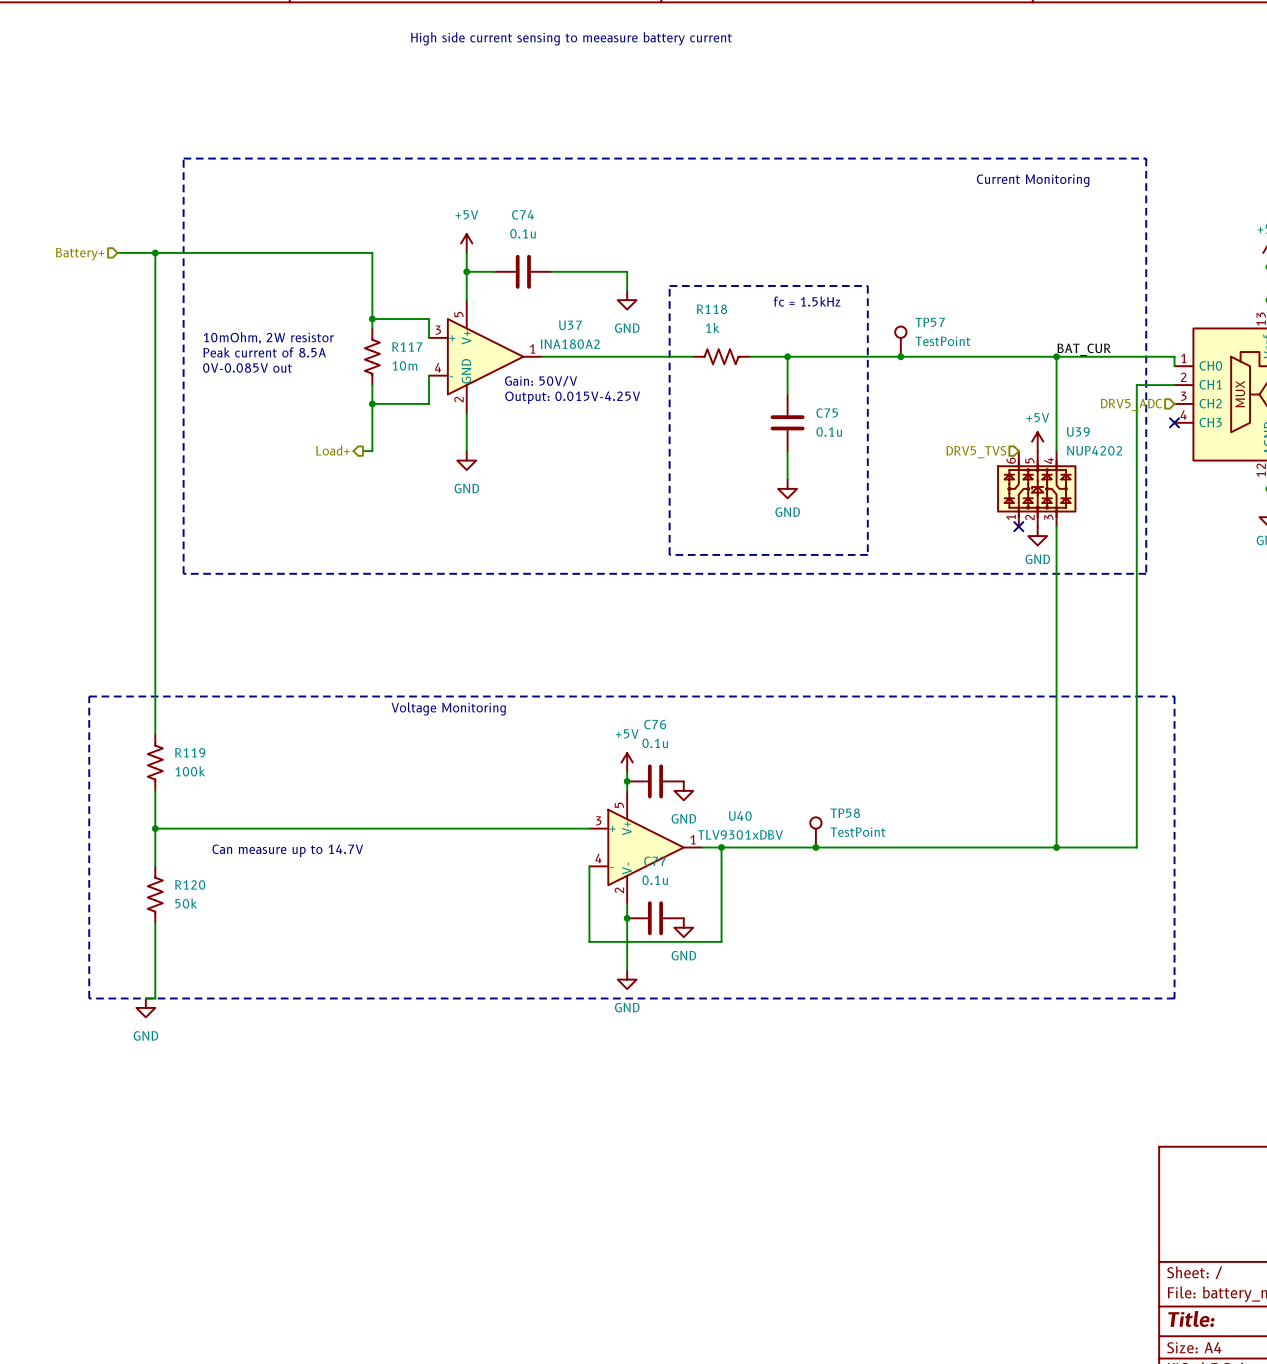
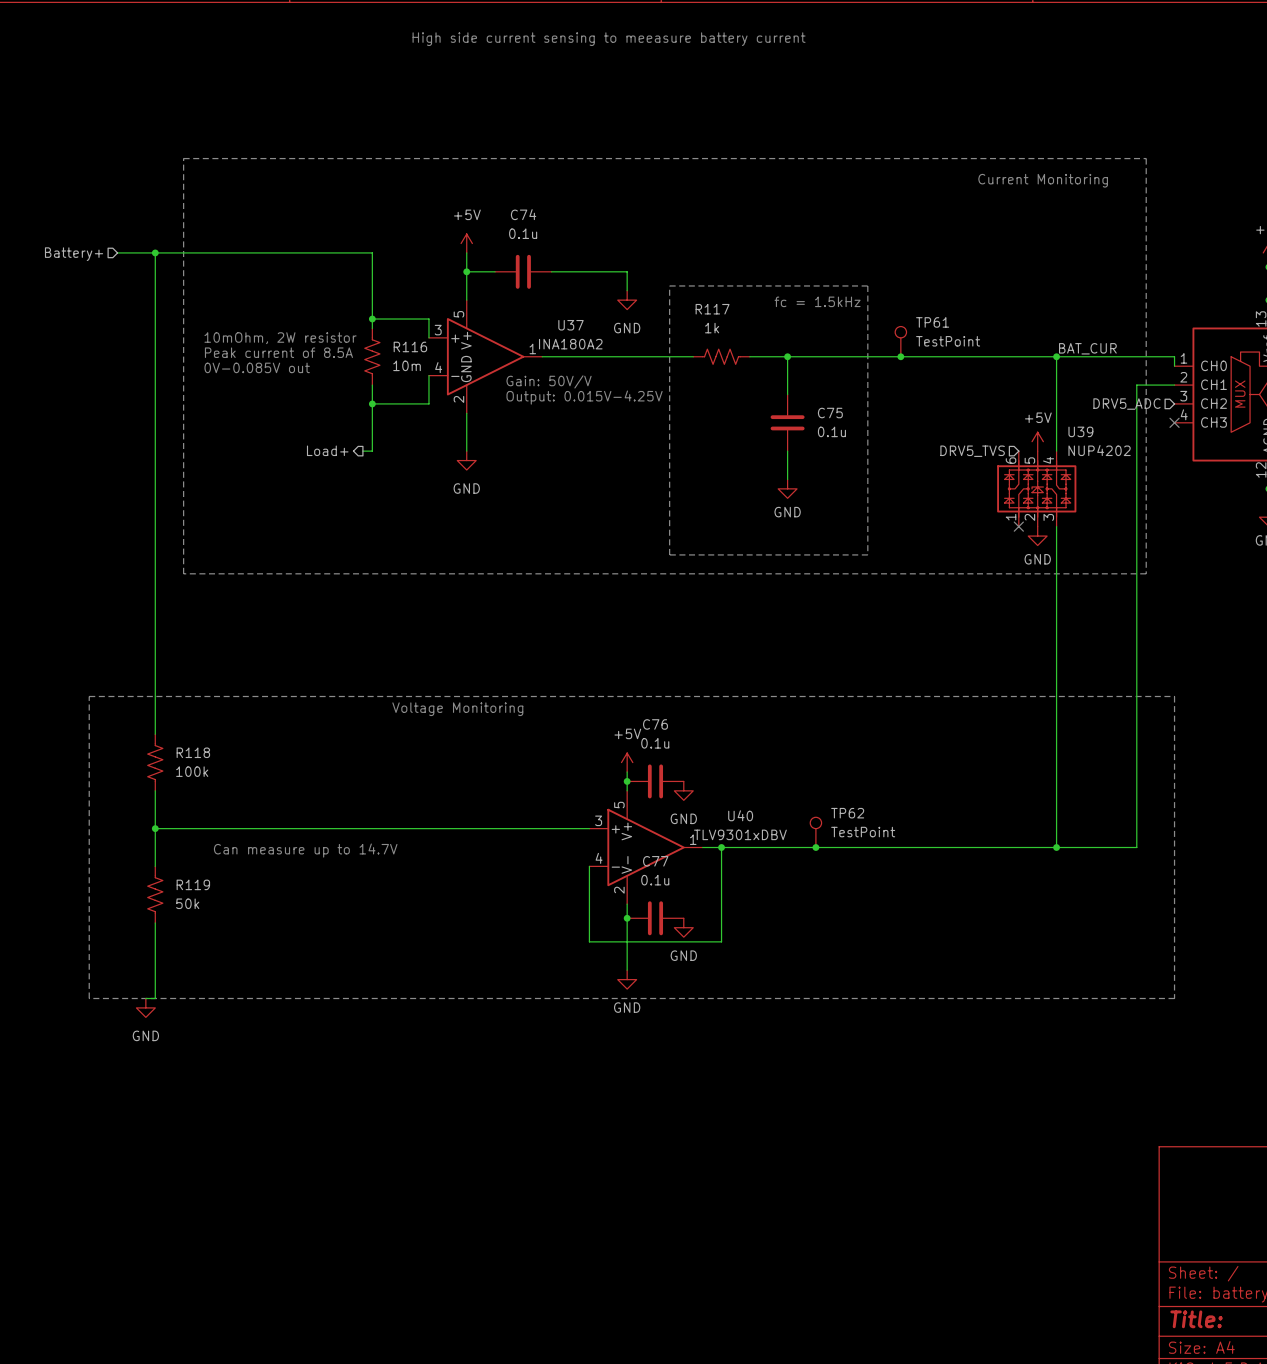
R118 name: R118 (712, 309) -> R117 (712, 309)
TP57 name: TP57 (930, 322) -> TP61 (932, 322)
R117 name: R117 (407, 346) -> R116 (410, 346)
R119 name: R119 (190, 752) -> R118 (193, 752)
TP58 name: TP58 (845, 813) -> TP62 (847, 813)
R120 name: R120 (190, 884) -> R119 (193, 884)

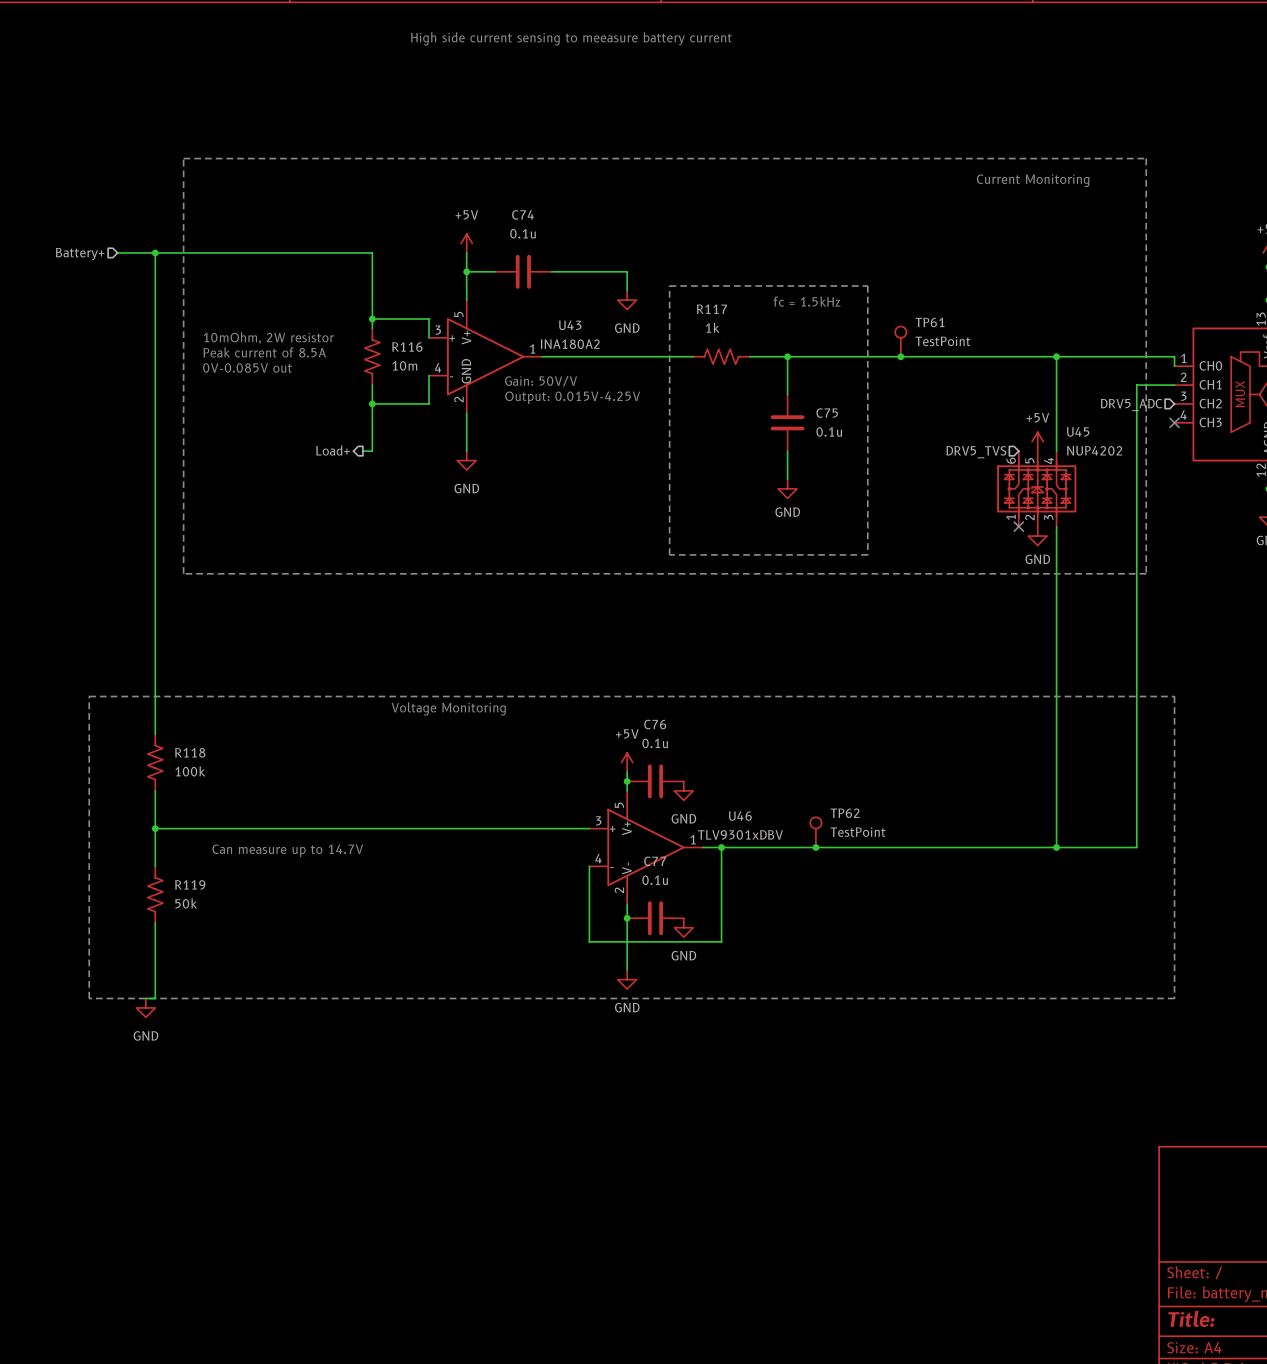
U37 name: U37 (570, 325) -> U43 (570, 325)
label: BAT_CUR (1087, 348) -> none
U39 name: U39 (1080, 431) -> U45 (1078, 431)
U40 name: U40 (740, 815) -> U46 (740, 816)

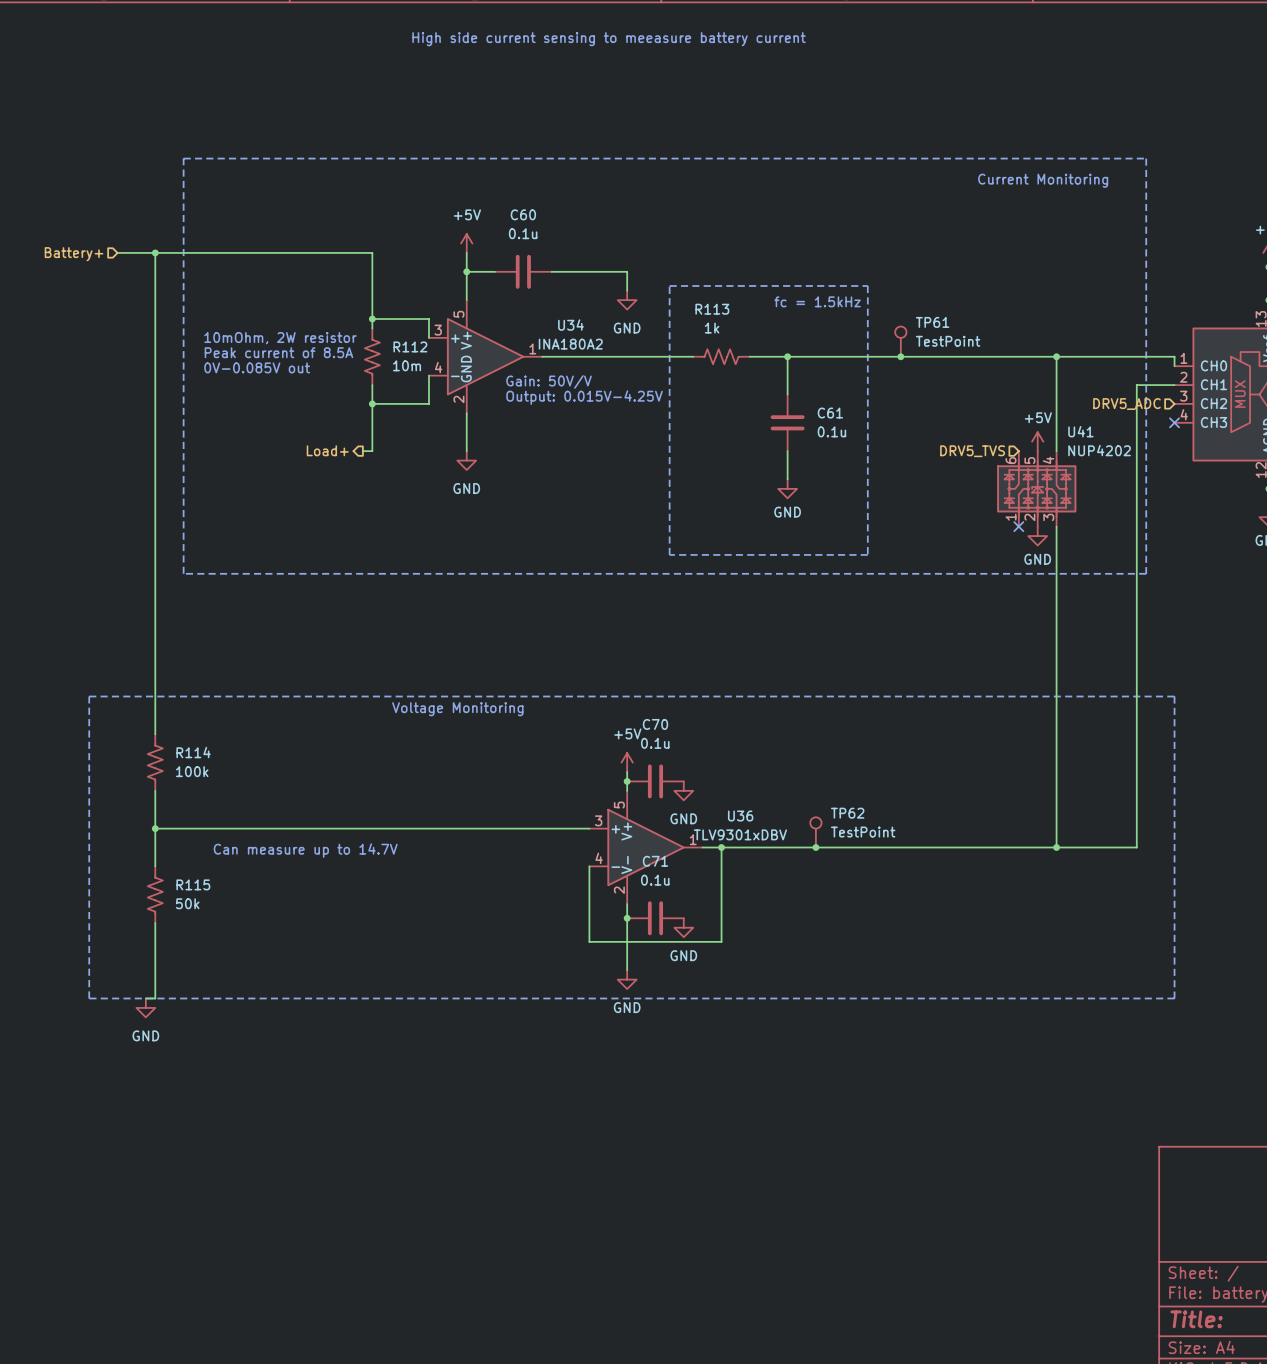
C74 name: C74 (523, 214) -> C60 (523, 214)
R117 name: R117 (711, 309) -> R113 (712, 309)
U43 name: U43 (570, 325) -> U34 (570, 325)
R116 name: R116 (407, 347) -> R112 (410, 346)
C75 name: C75 (827, 413) -> C61 (830, 413)
U45 name: U45 (1078, 431) -> U41 (1080, 431)
C76 name: C76 (655, 724) -> C70 (655, 724)
R118 name: R118 (190, 752) -> R114 (193, 752)
U46 name: U46 (740, 816) -> U36 (740, 816)
C77 name: C77 (655, 861) -> C71 (655, 861)
R119 name: R119 (190, 884) -> R115 (193, 884)

